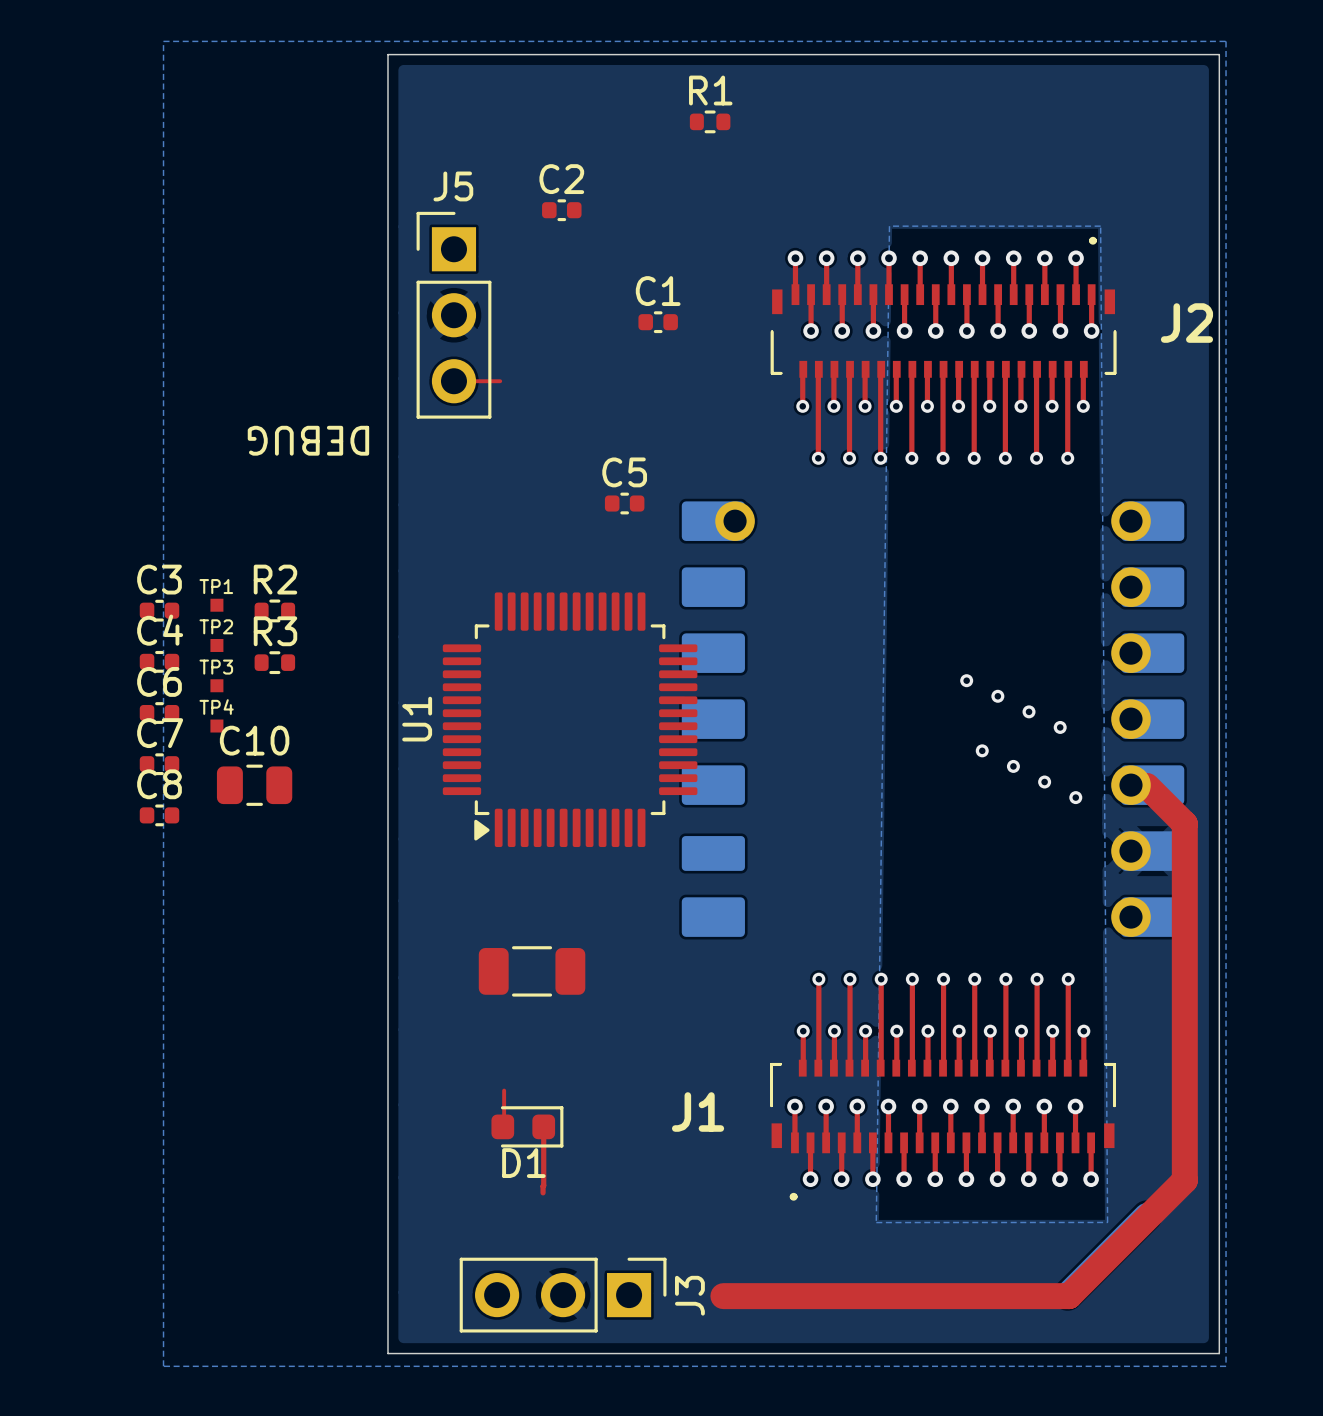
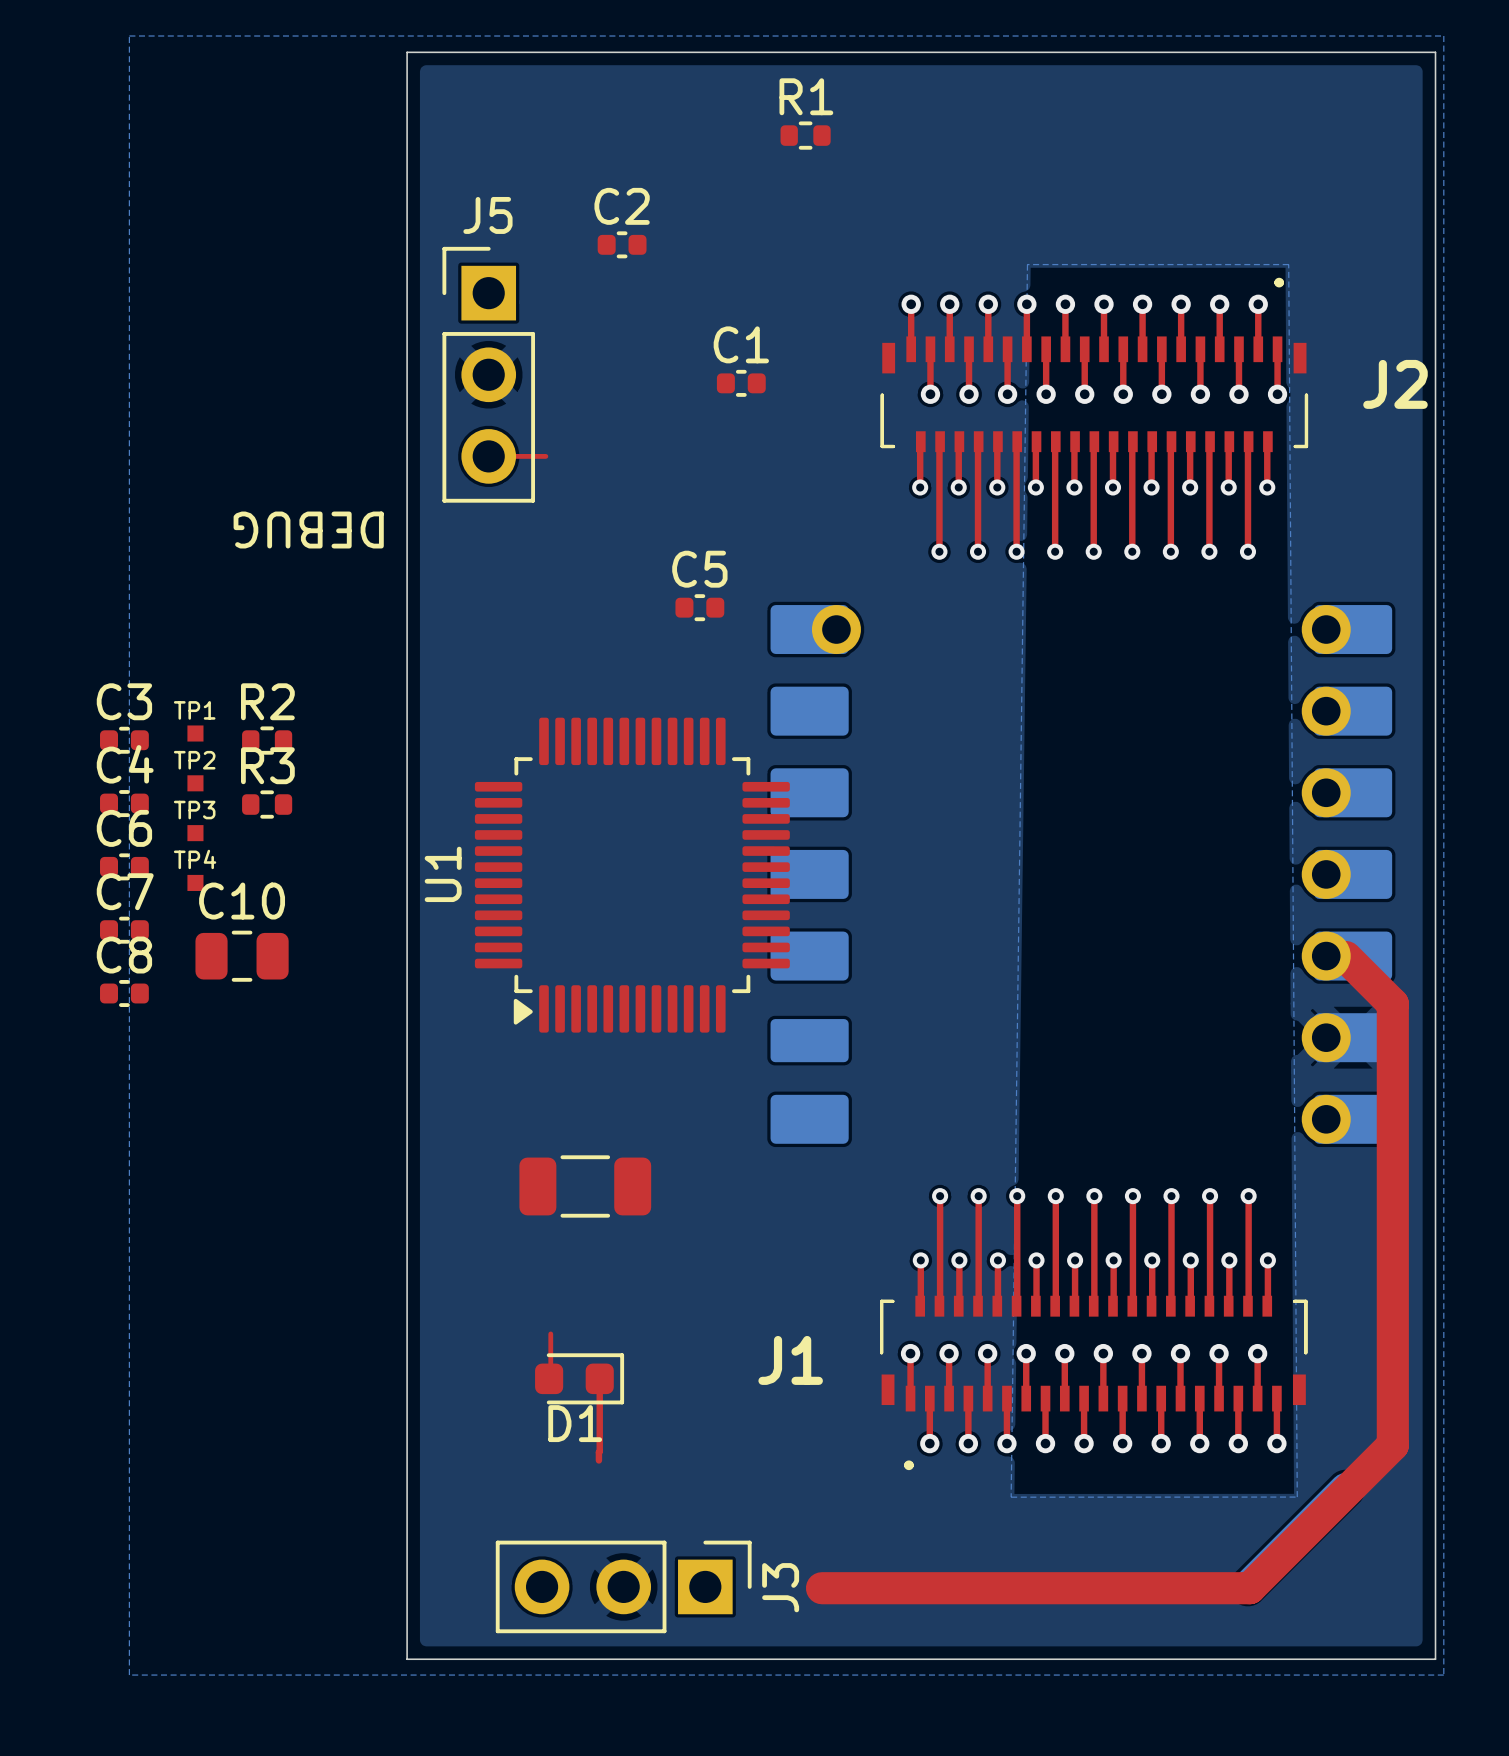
via: (966, 680) -> none
via: (997, 696) -> none
via: (1029, 711) -> none
via: (1060, 727) -> none
via: (982, 750) -> none
via: (1013, 766) -> none
via: (1044, 782) -> none
via: (1075, 797) -> none

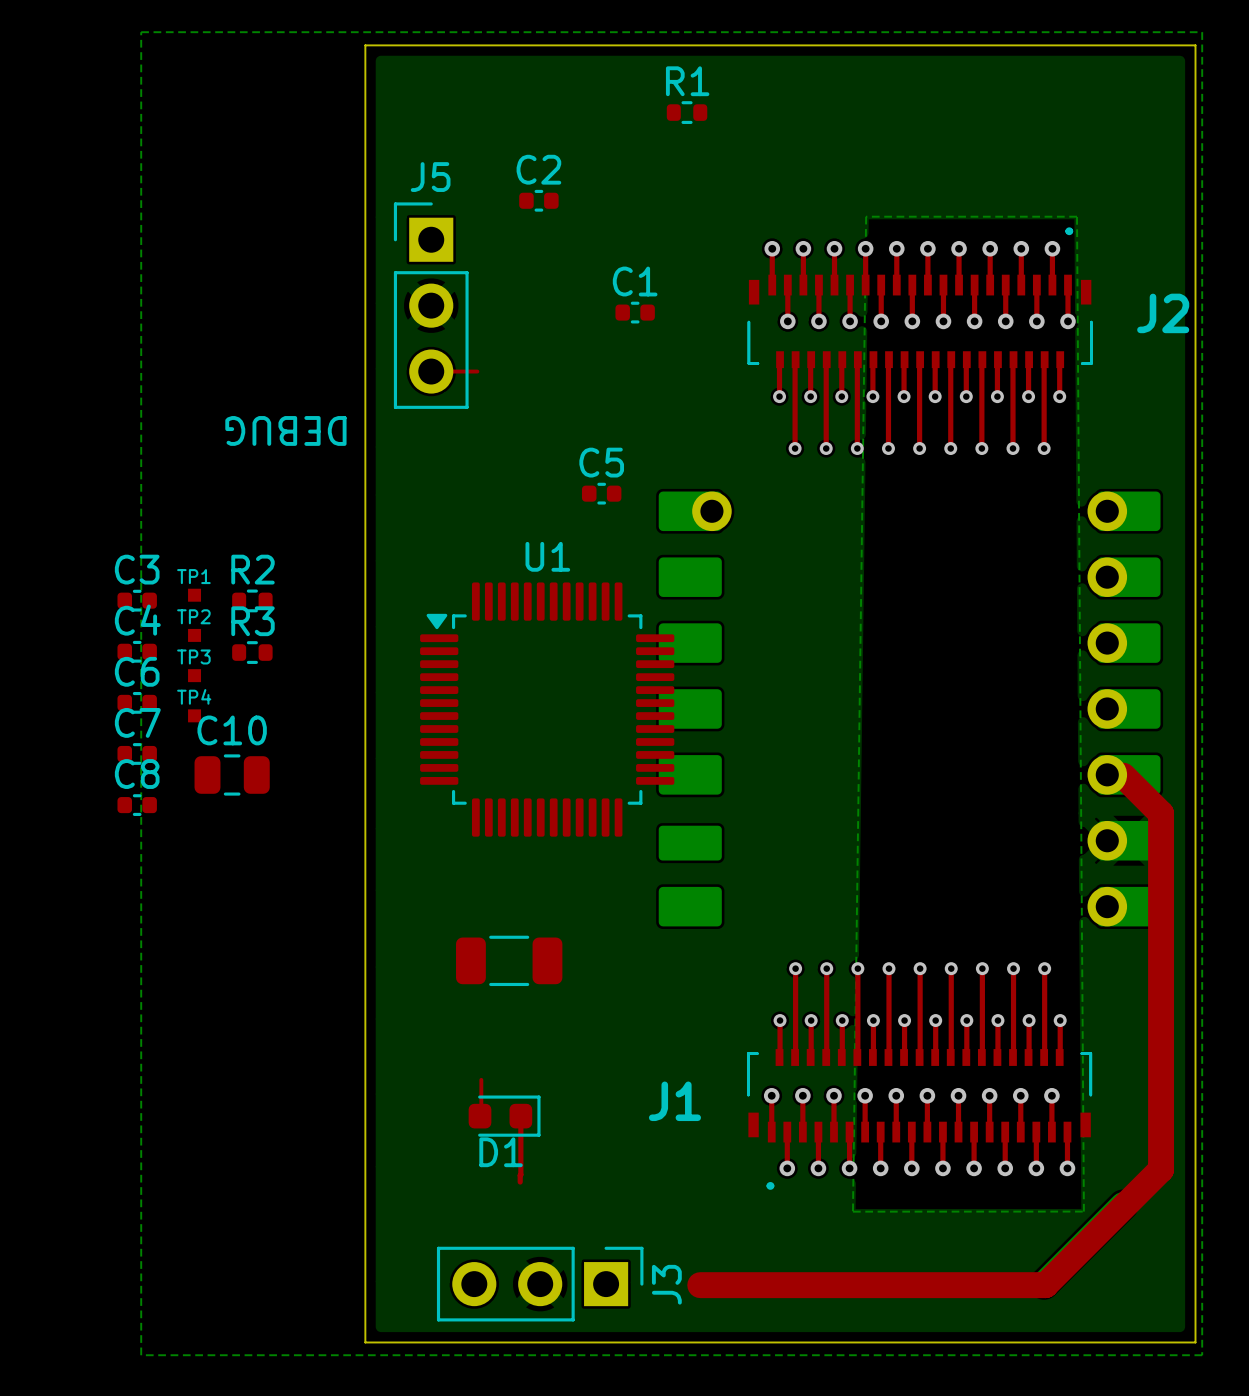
U1 rotation: 0° (632, 875) -> 90° clockwise (547, 709)

